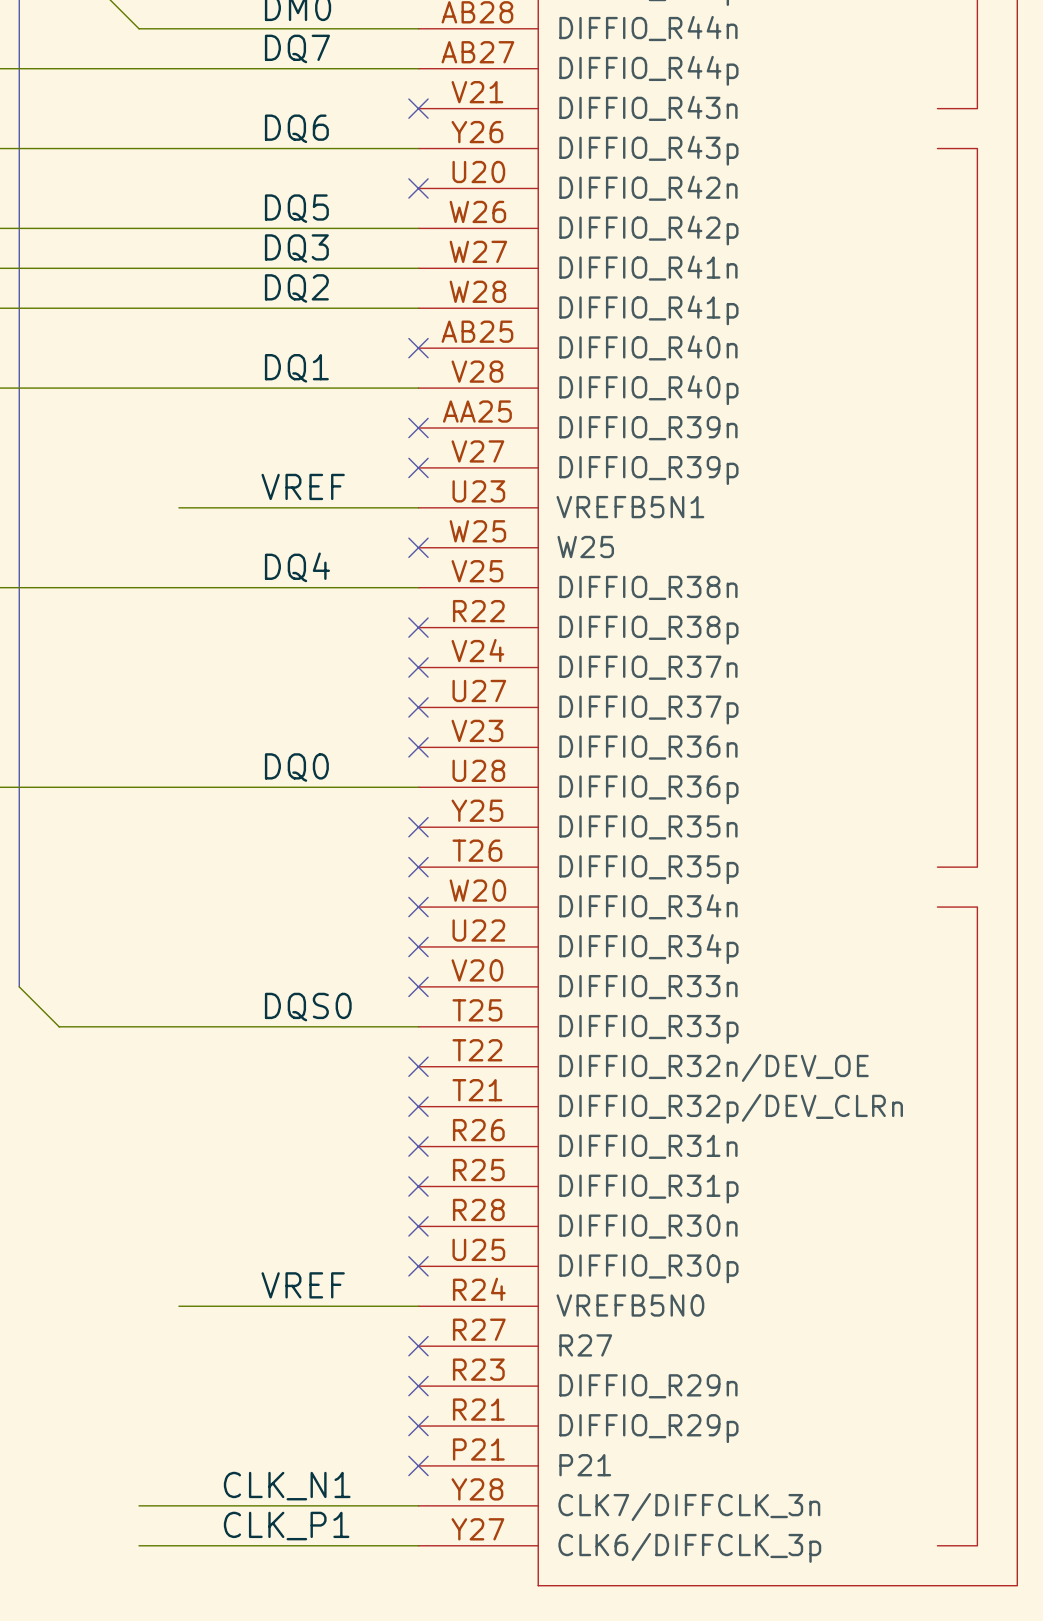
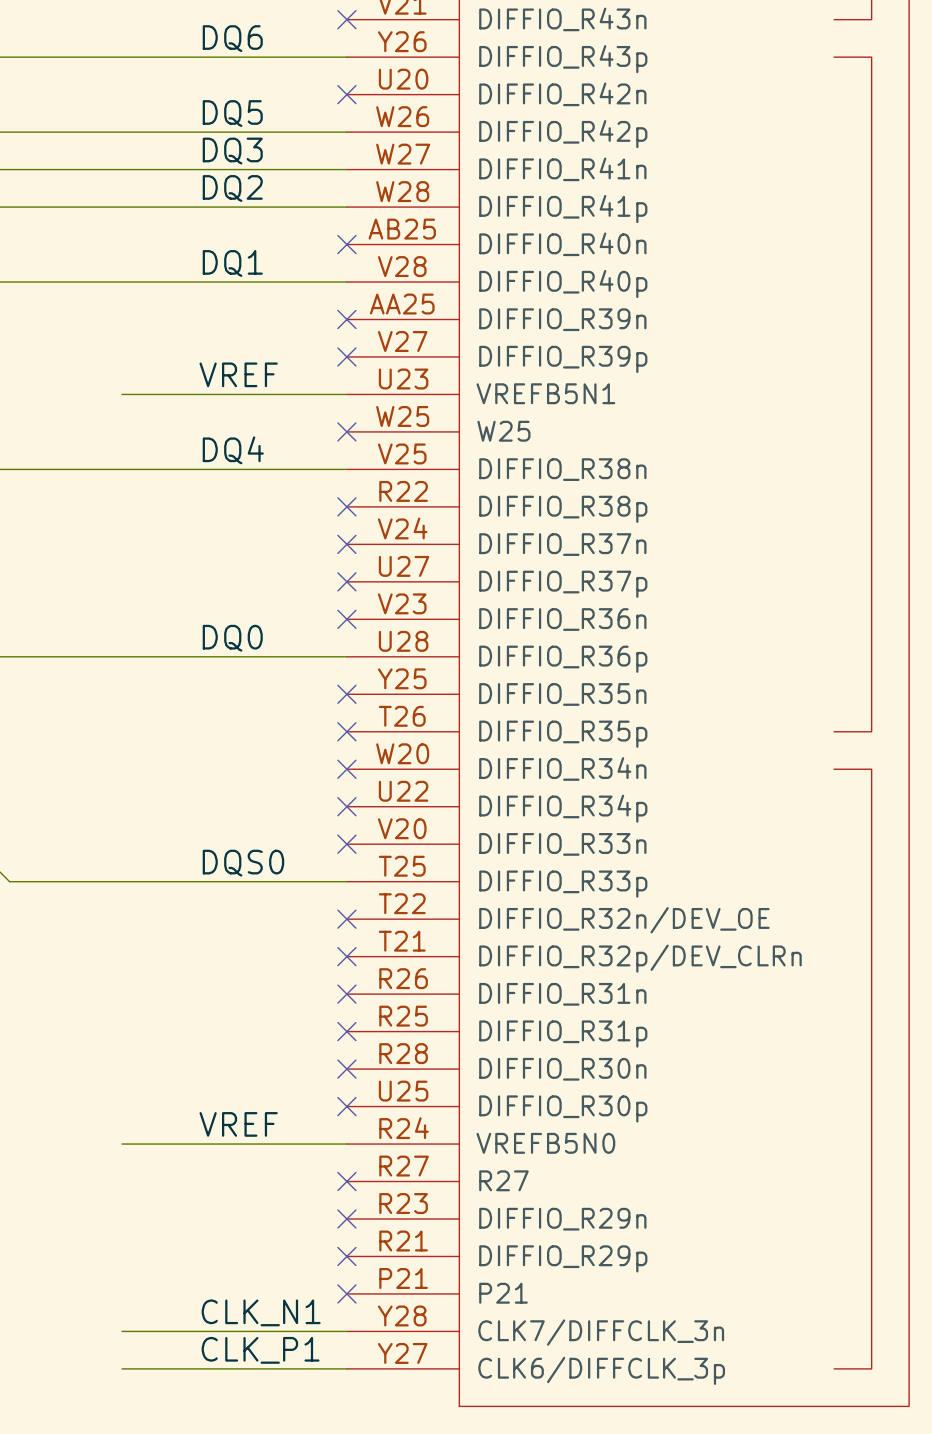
label position: CLK_N1 (287, 1486) -> CLK_N1 (261, 1312)
wire: (139, 1505) (178, 1505) -> none
label position: CLK_P1 (286, 1526) -> CLK_P1 (260, 1350)
wire: (139, 1545) (178, 1545) -> none

